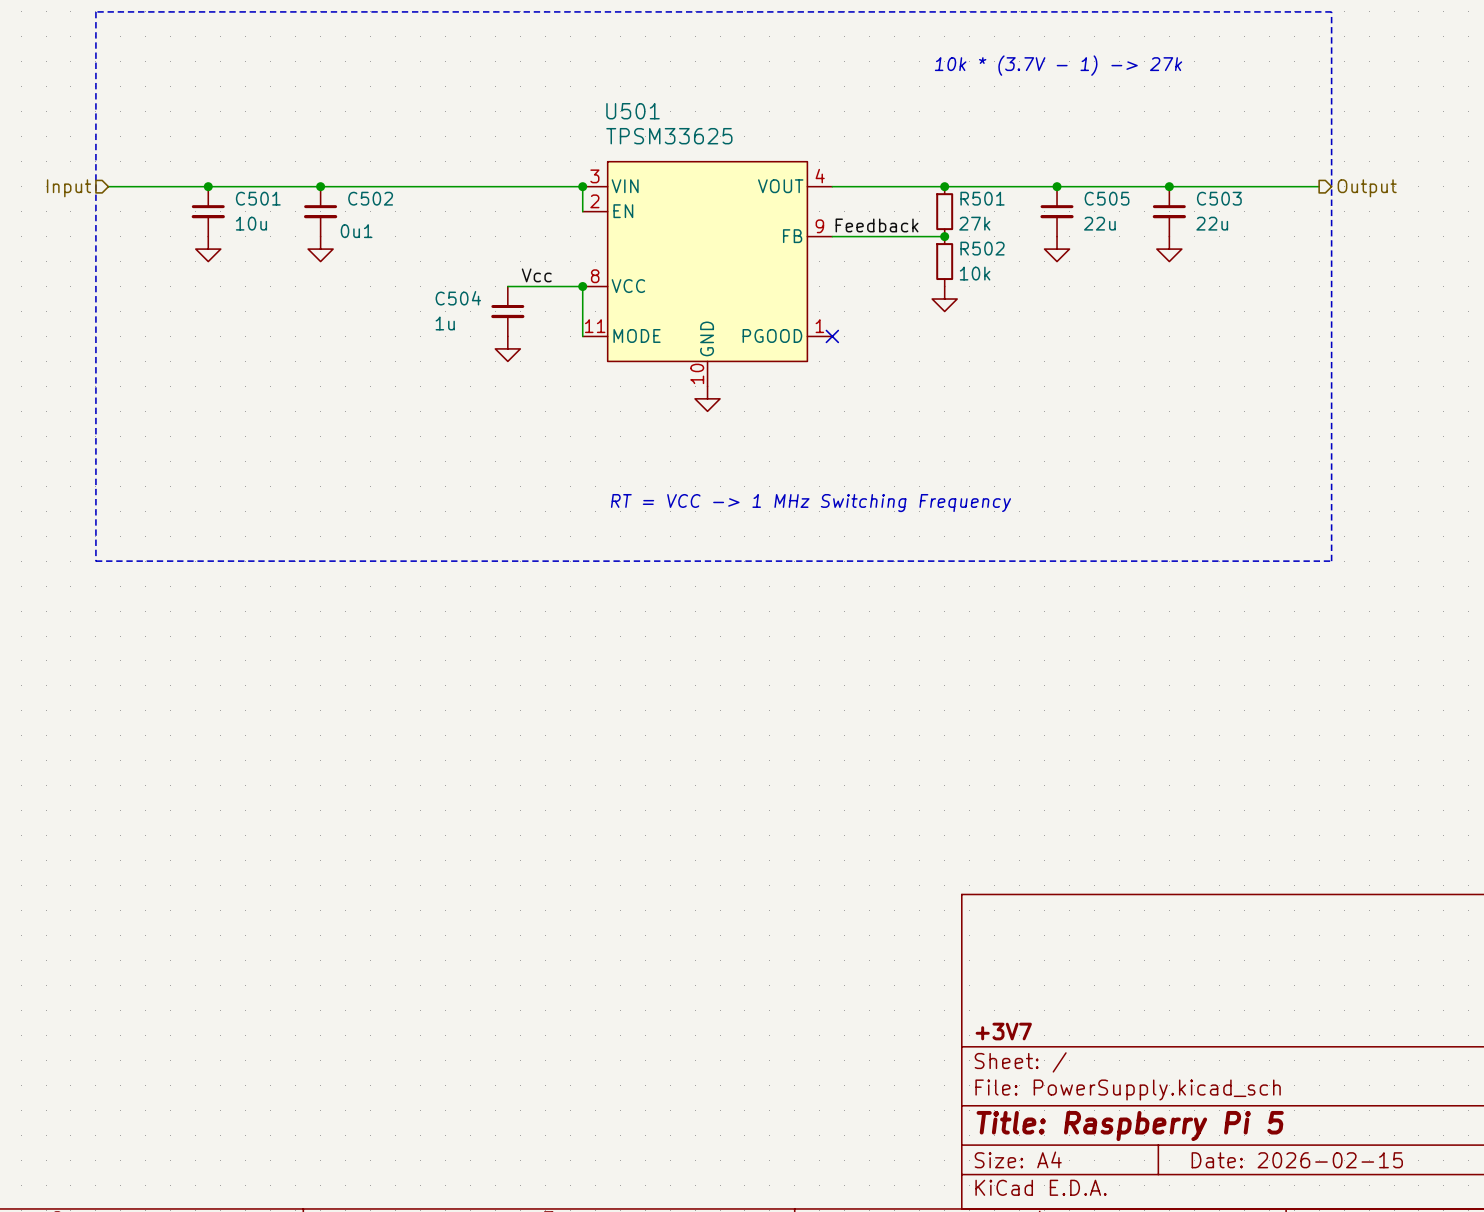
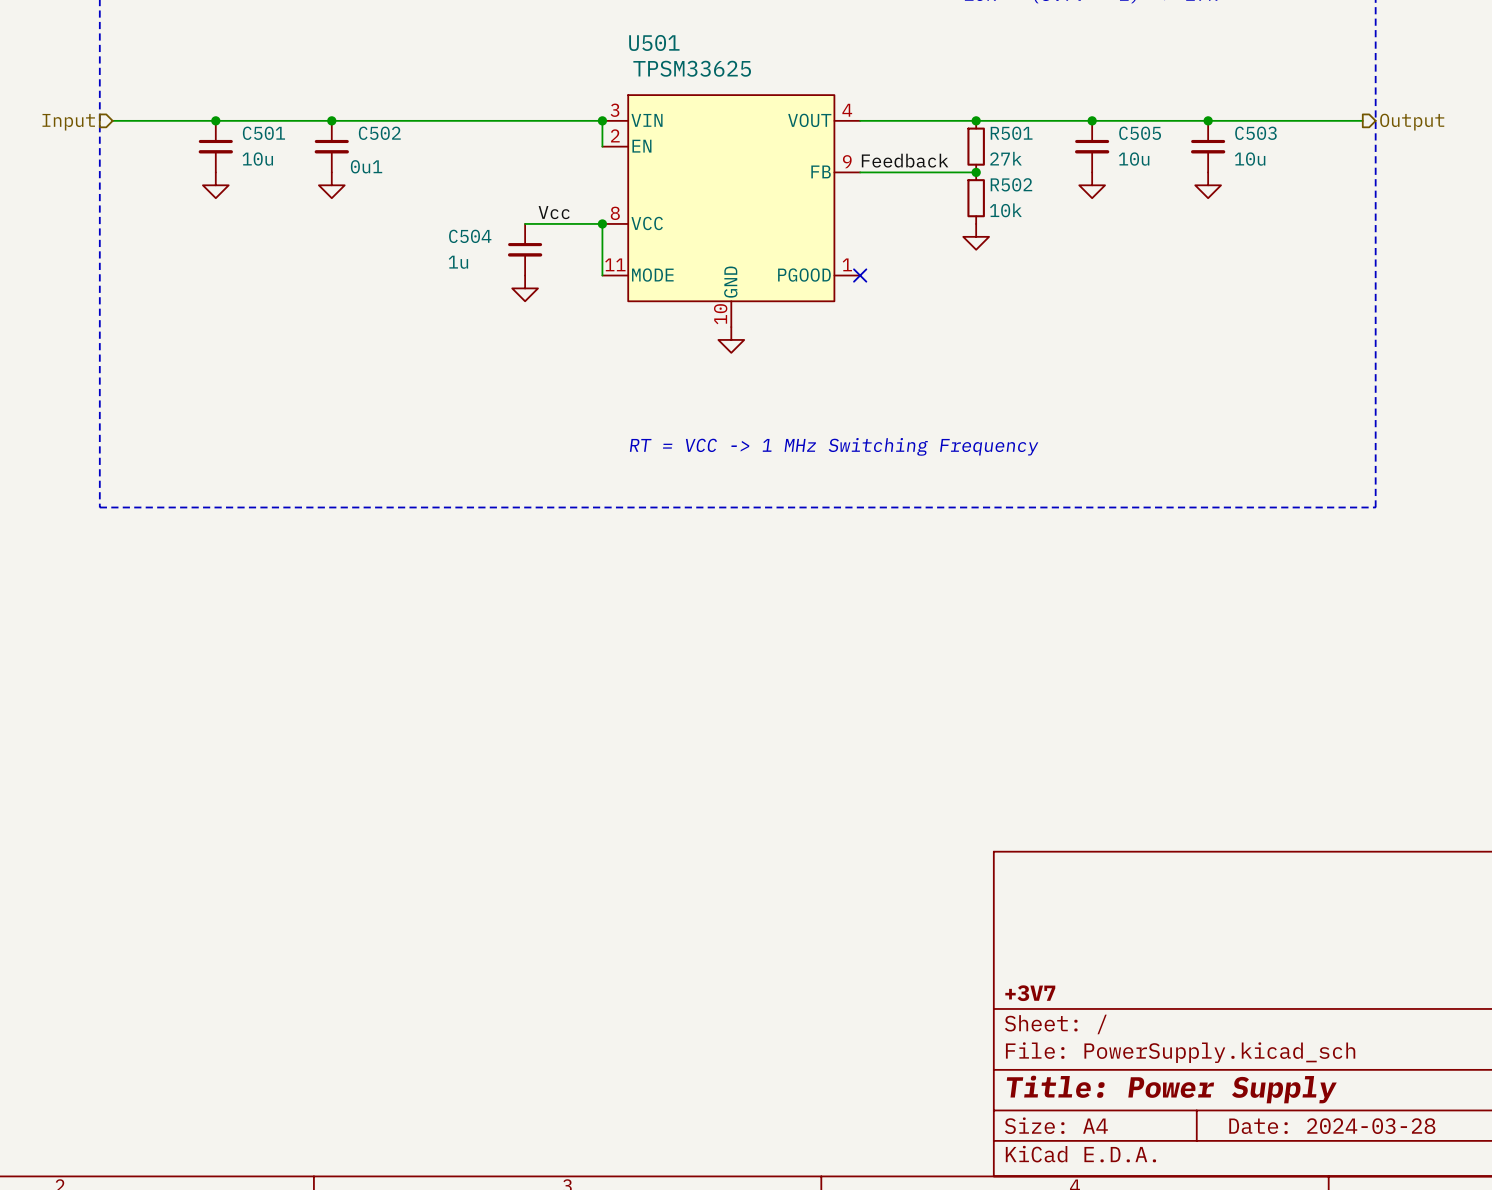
C505 value: 22u (1099, 223) -> 10u (1134, 159)
C503 value: 22u (1212, 223) -> 10u (1250, 159)
title block: Title: Raspberry Pi 5 (1130, 1126) -> Title: Power Supply (1171, 1089)
title block: Date: 2026-02-15 (1297, 1160) -> Date: 2024-03-28 (1332, 1126)

